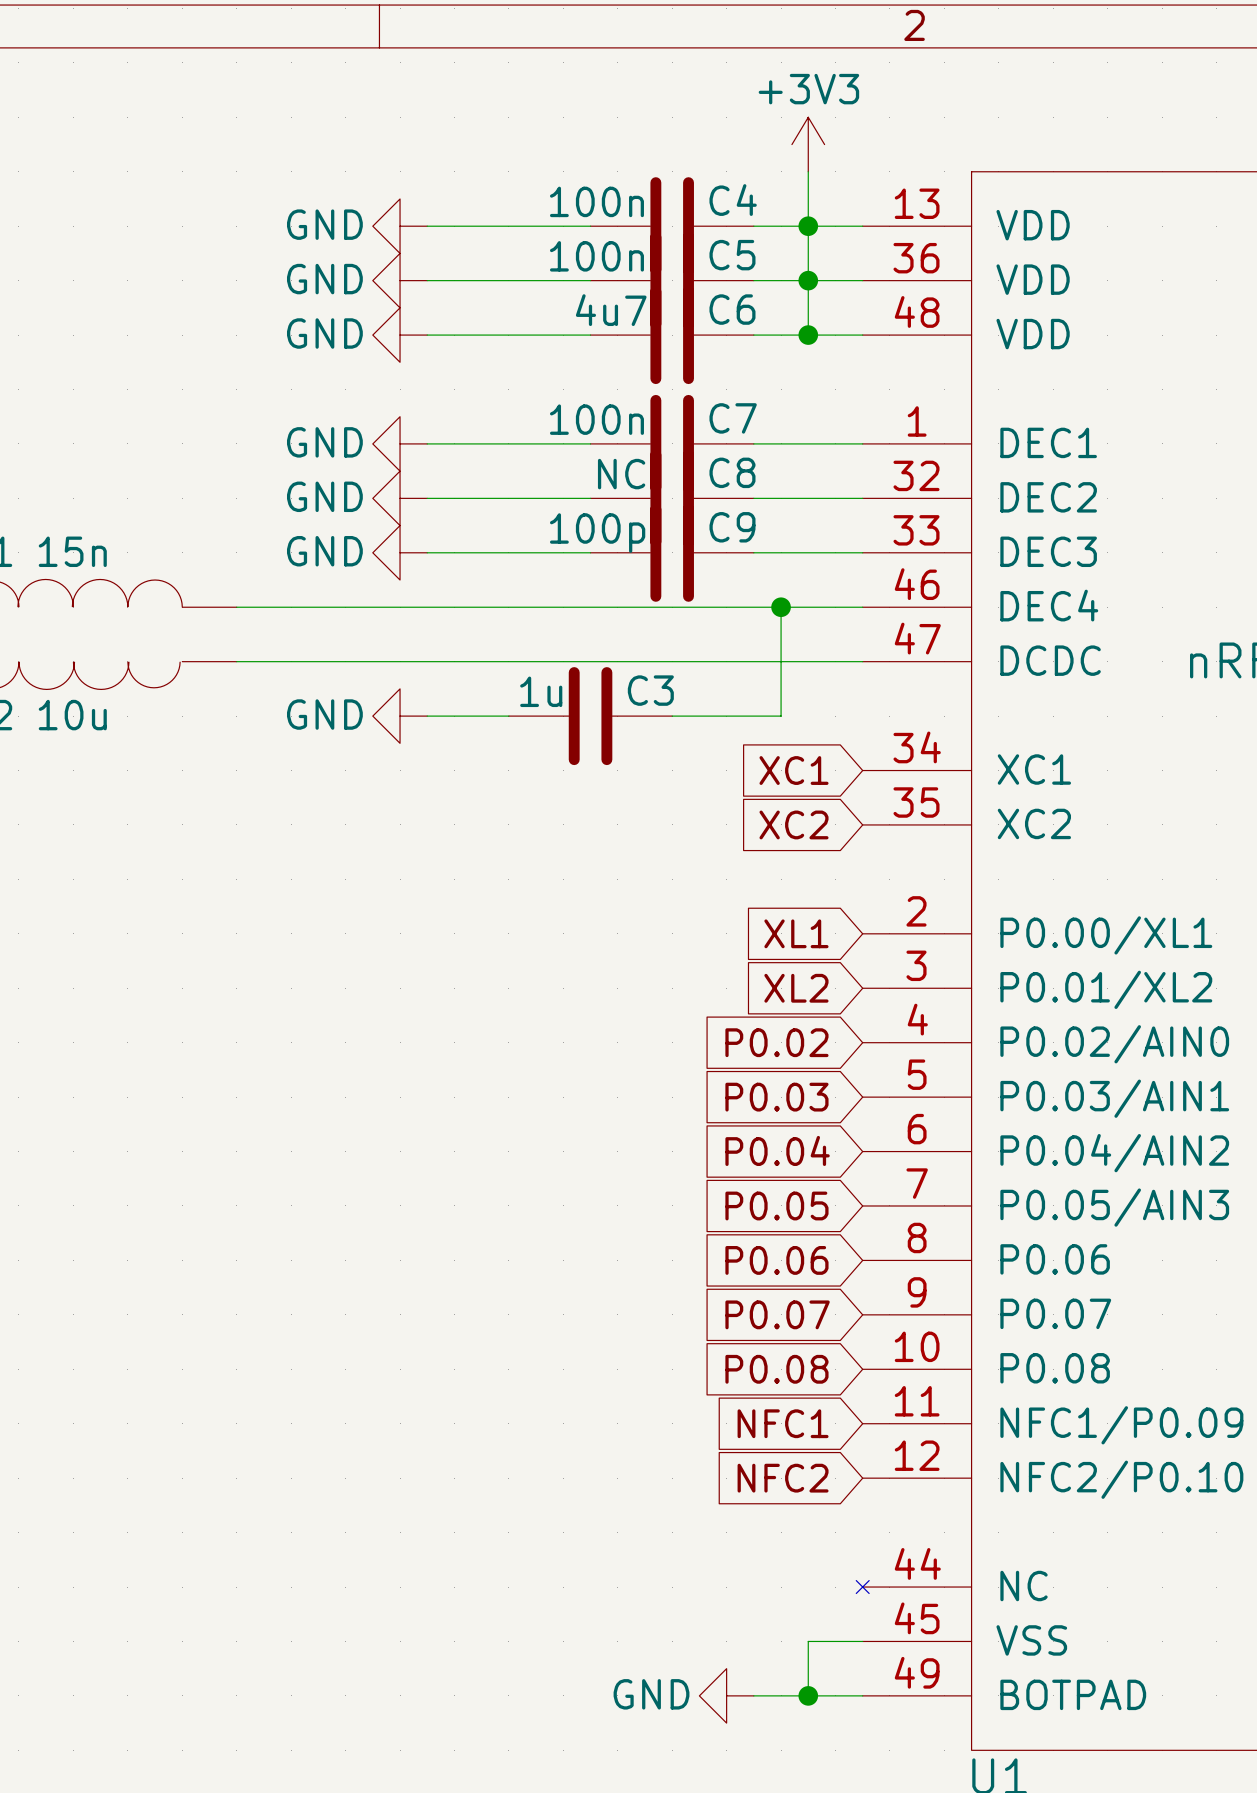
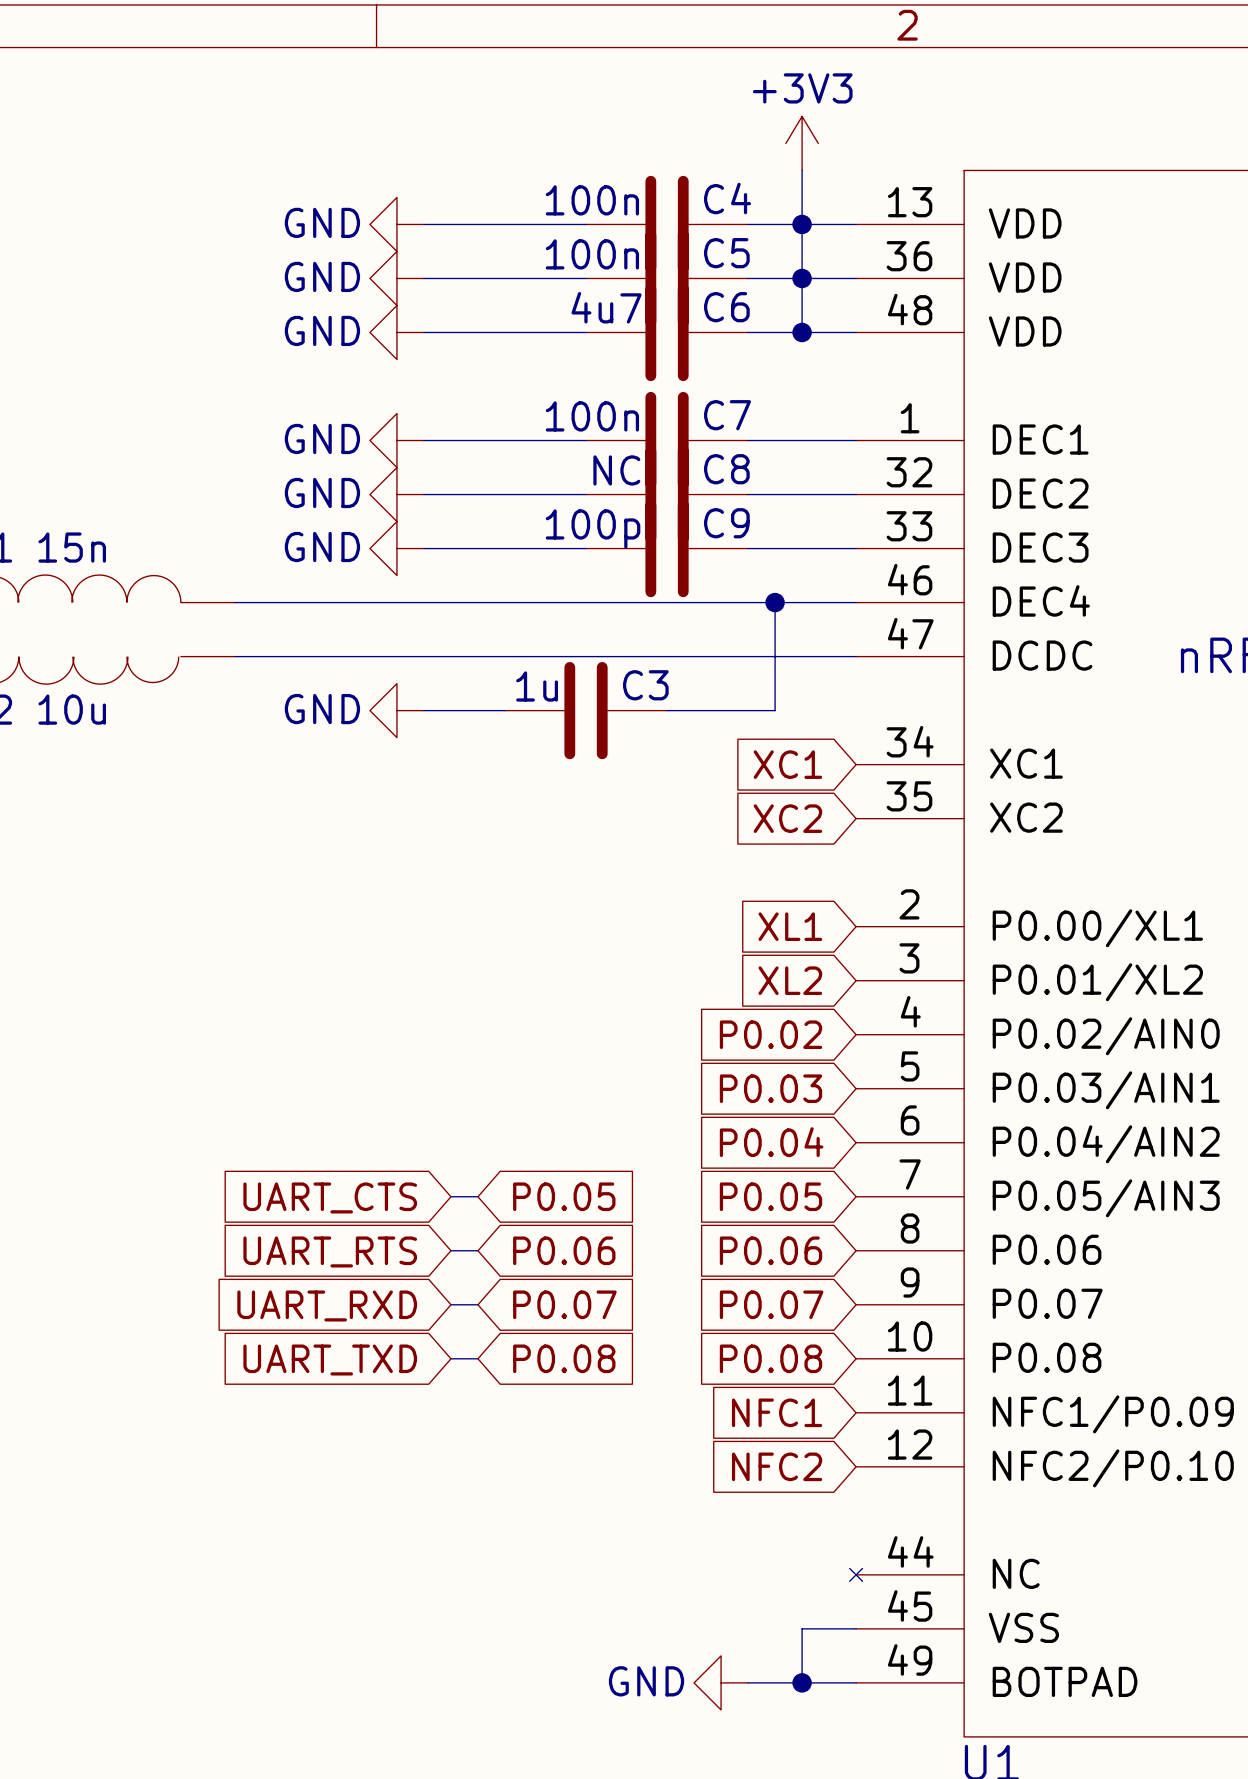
wire: none -> (450, 1196) (477, 1196)
global label: none -> P0.05 (564, 1196)
global label: none -> UART_CTS (330, 1197)
wire: none -> (450, 1250) (477, 1250)
global label: none -> P0.06 (564, 1250)
global label: none -> UART_RTS (330, 1251)
wire: none -> (450, 1304) (477, 1304)
global label: none -> P0.07 (564, 1304)
global label: none -> UART_RXD (327, 1305)
wire: none -> (450, 1358) (477, 1358)
global label: none -> P0.08 (564, 1358)
global label: none -> UART_TXD (330, 1360)

